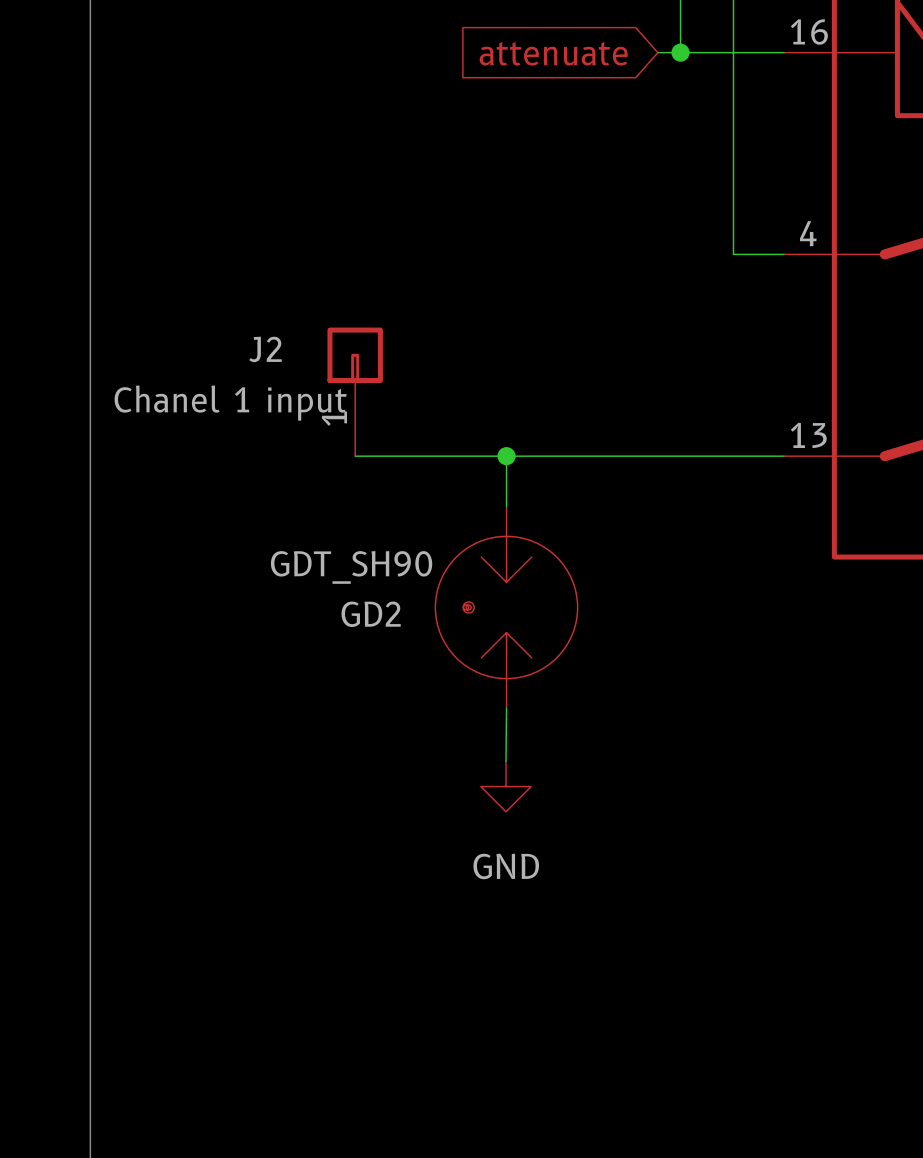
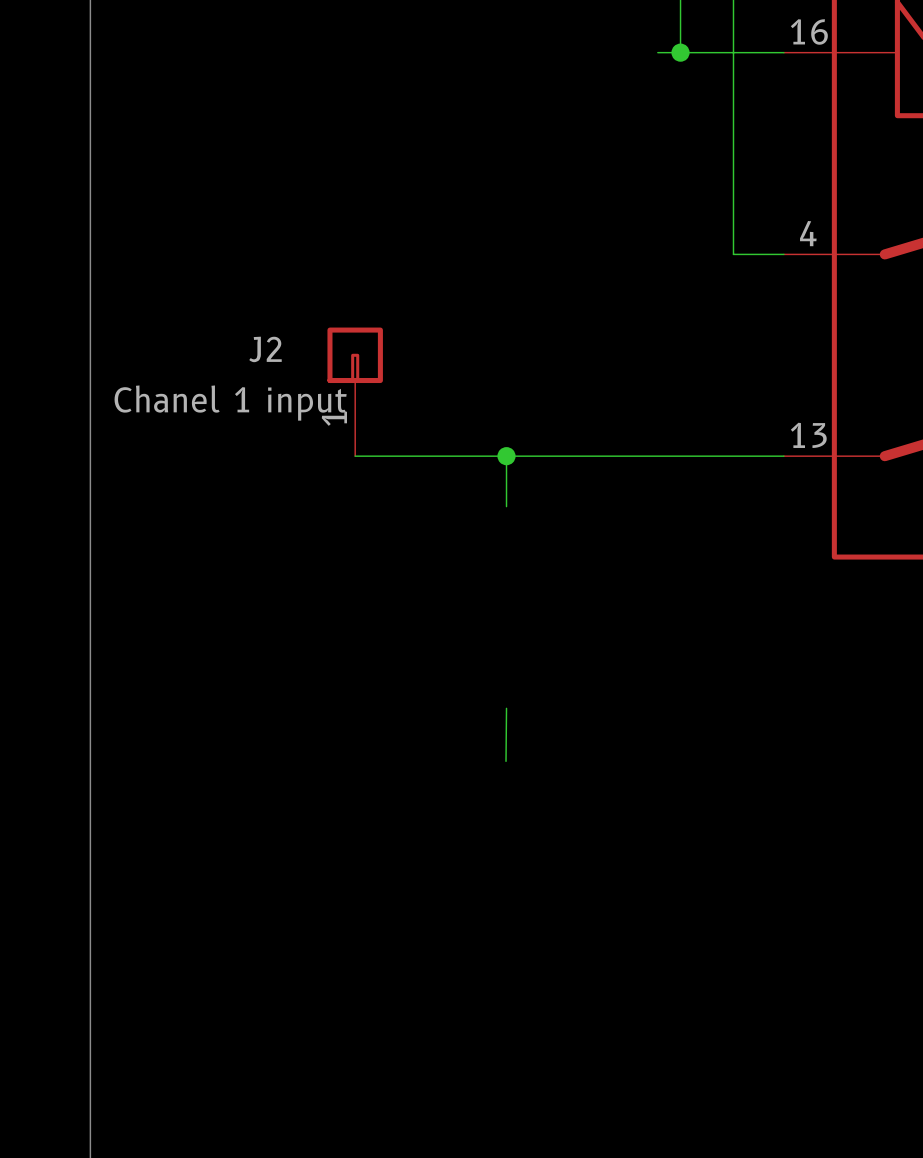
global label: attenuate (553, 53) -> none
GD2: GDT_SH90 (506, 607) -> none
power symbol: GND (506, 786) -> none

